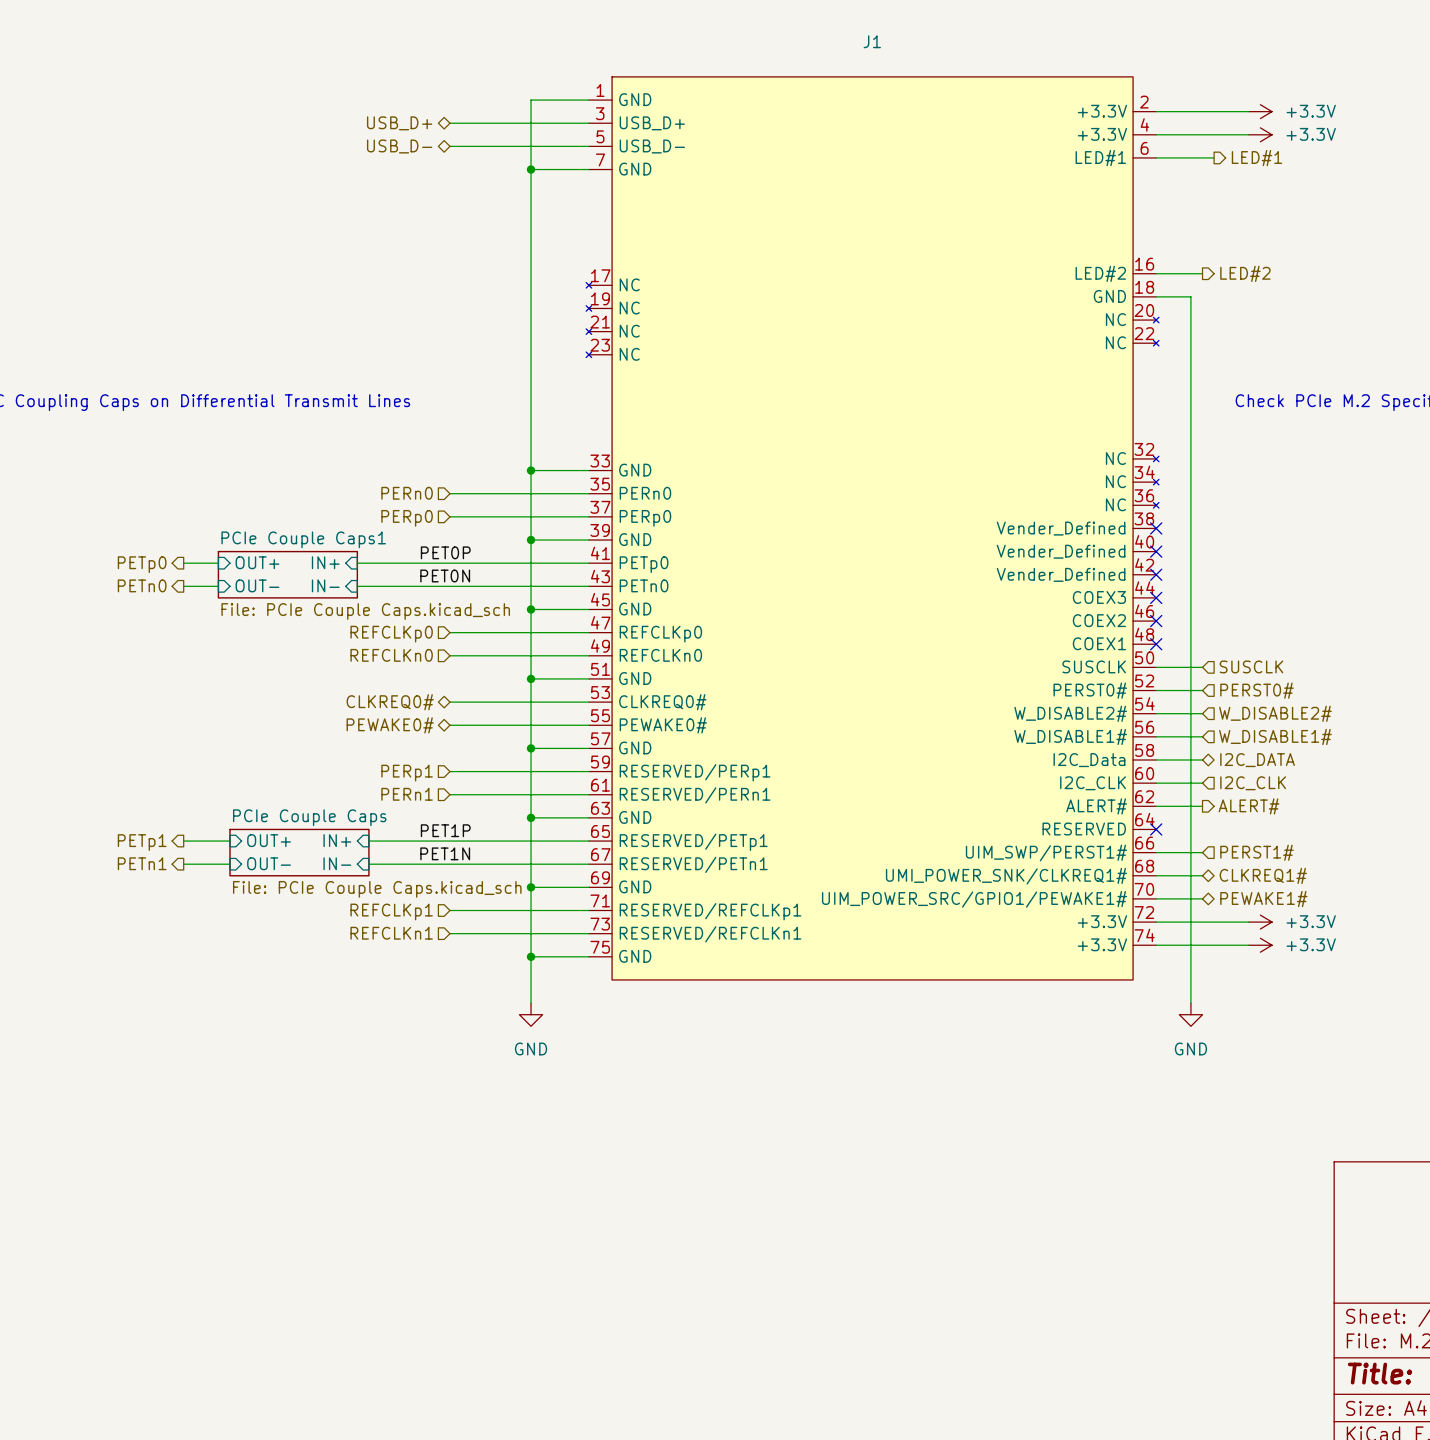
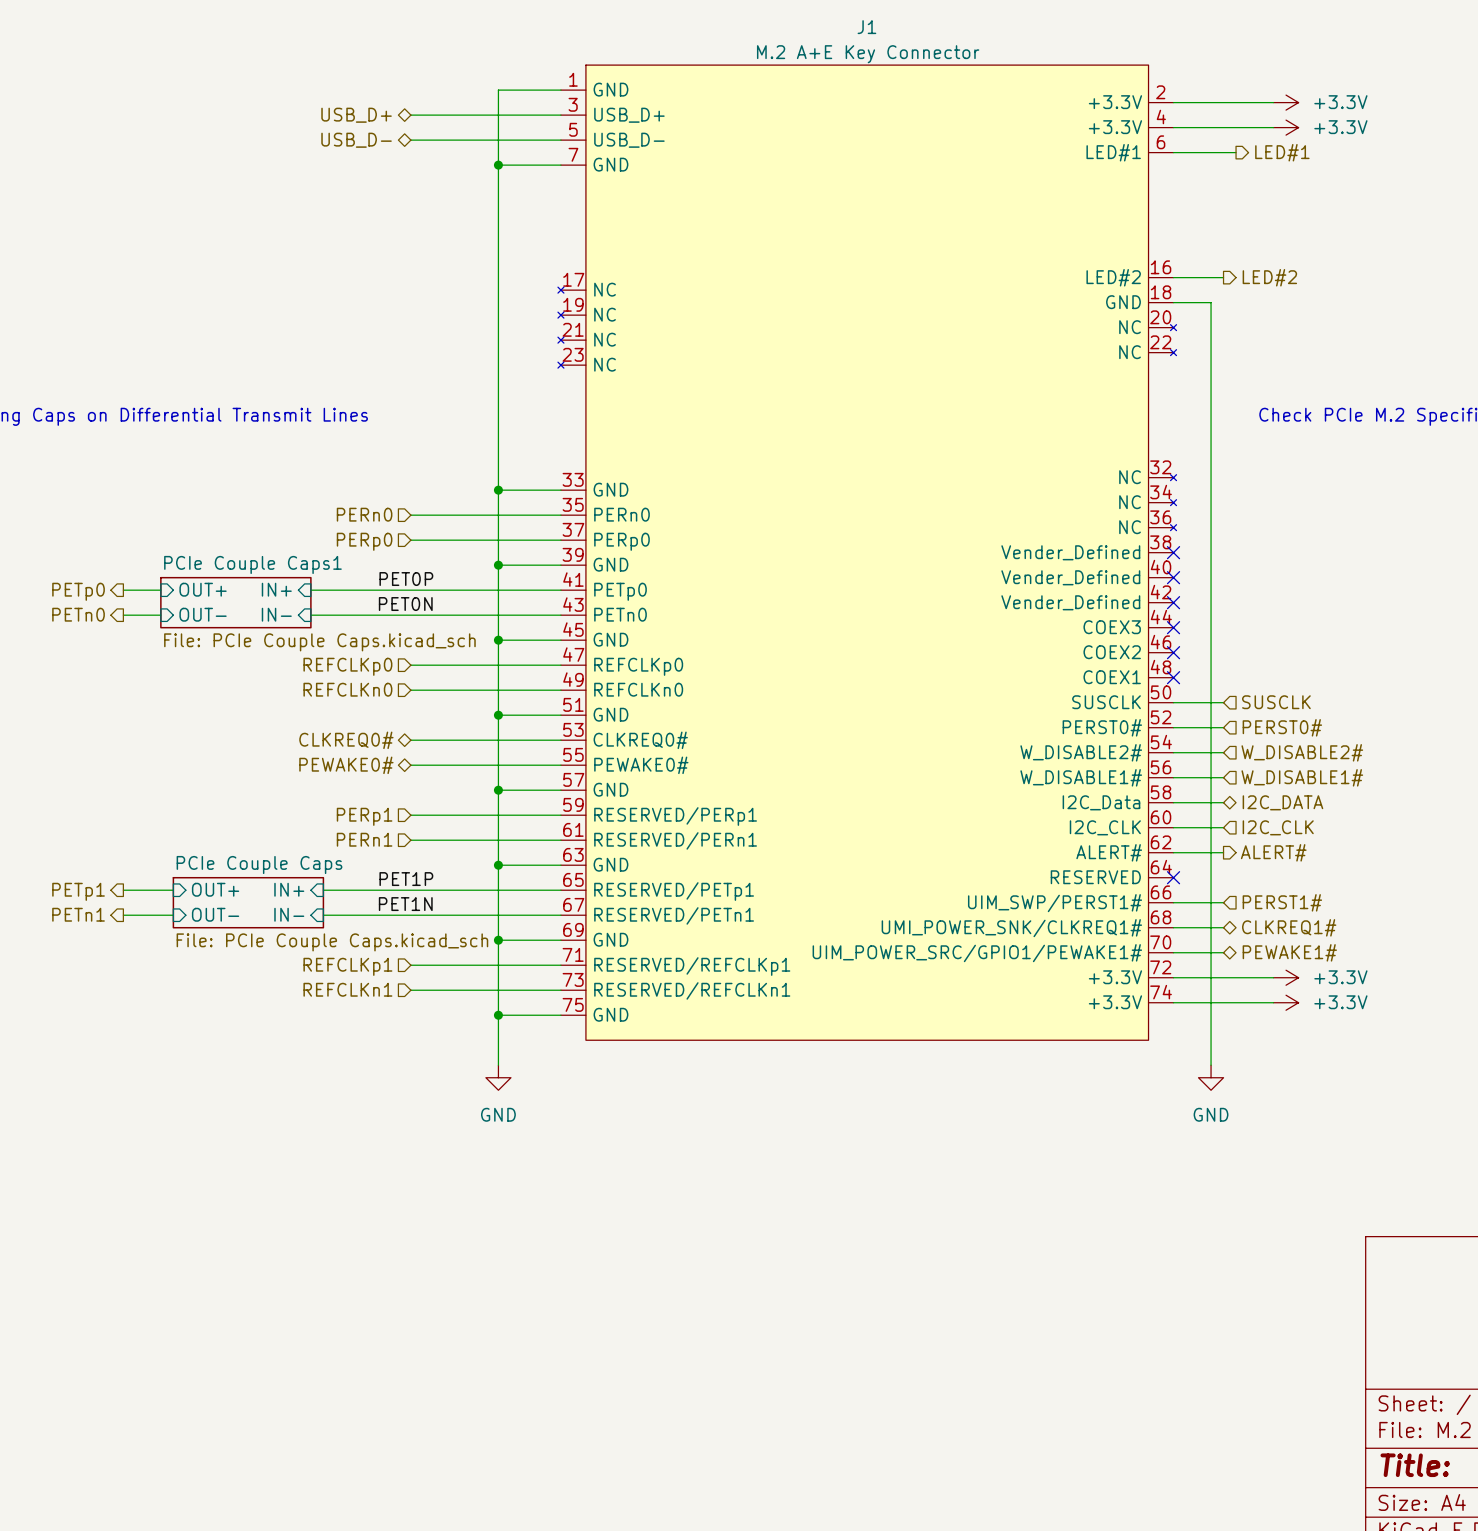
J1 value: none -> M.2 A+E Key Connector (868, 54)

